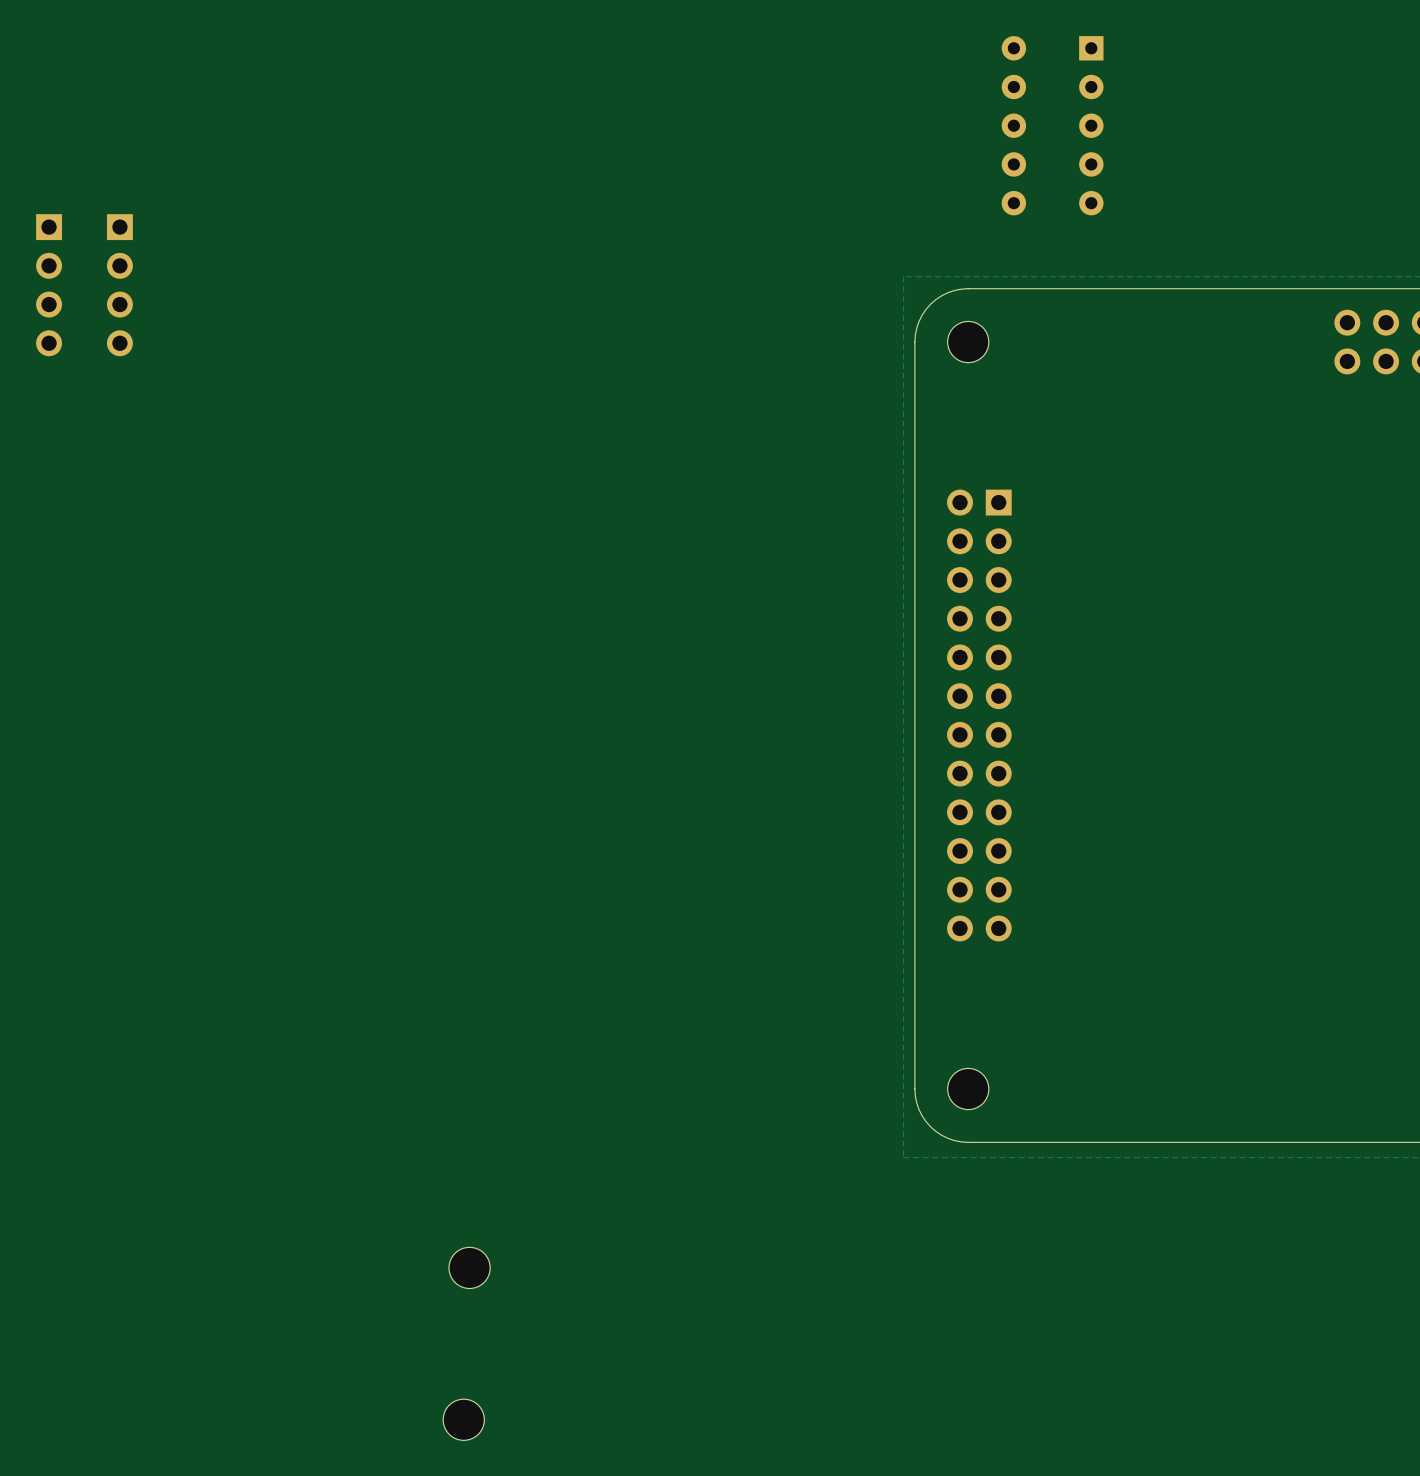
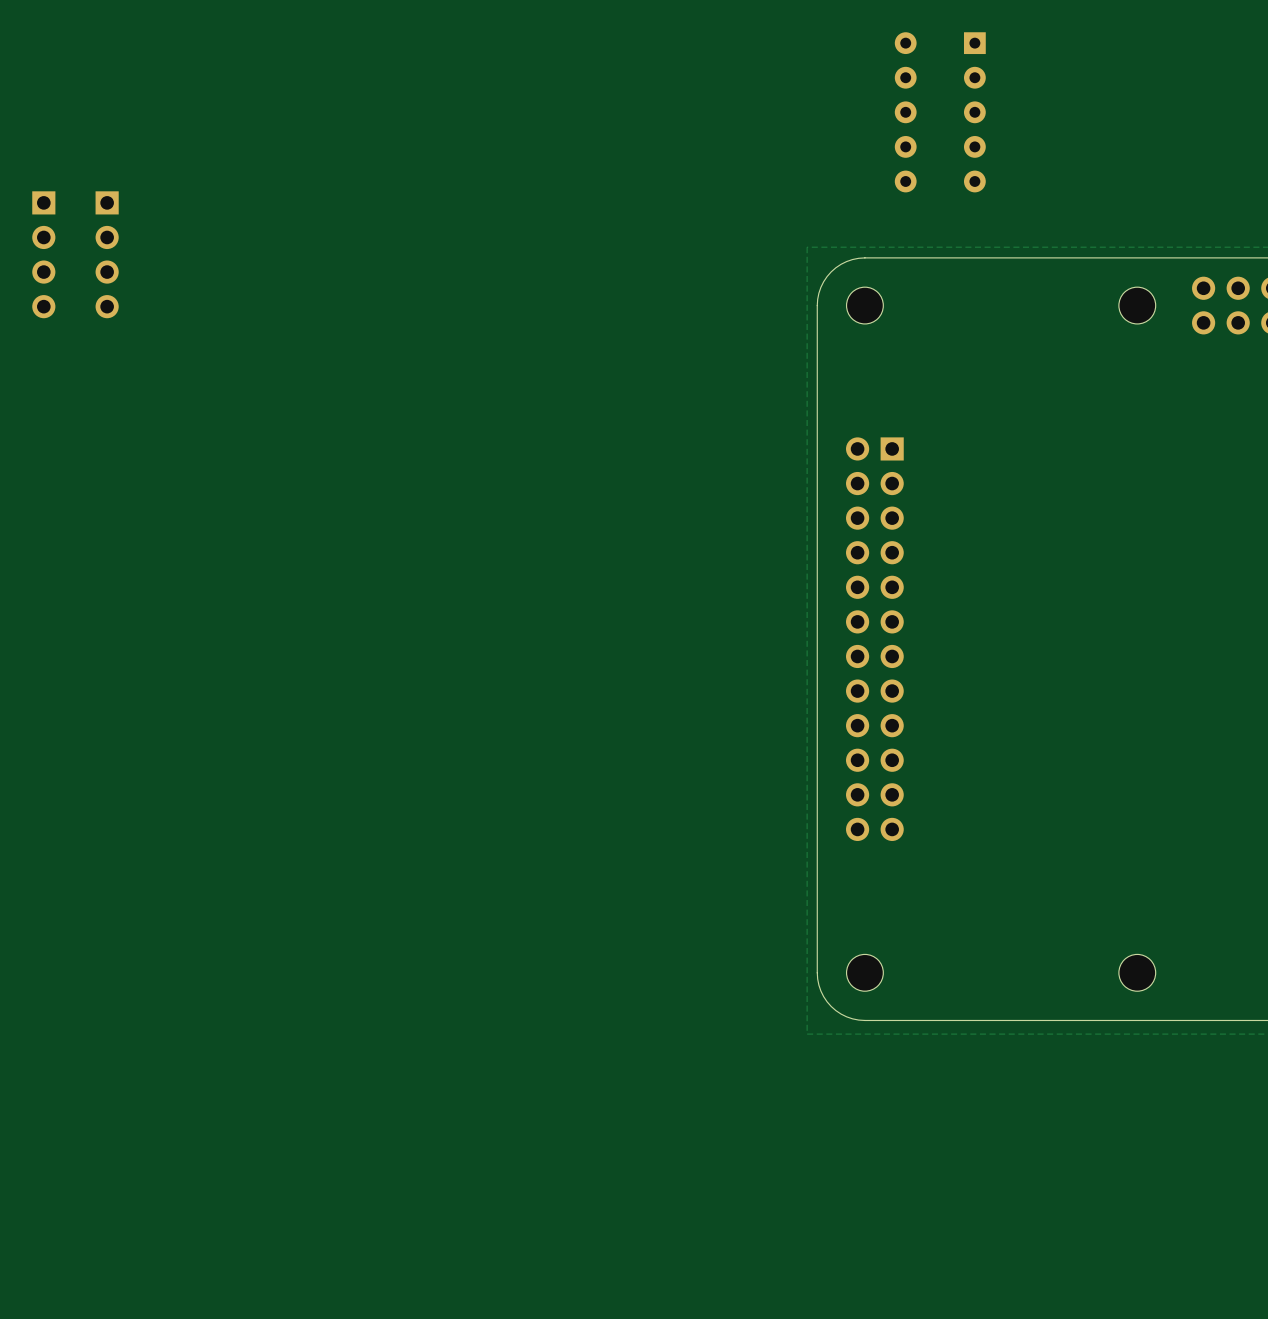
part: none -> (1137, 305)
part: none -> (1137, 972)
part: (469, 1267) -> none
part: (463, 1419) -> none

